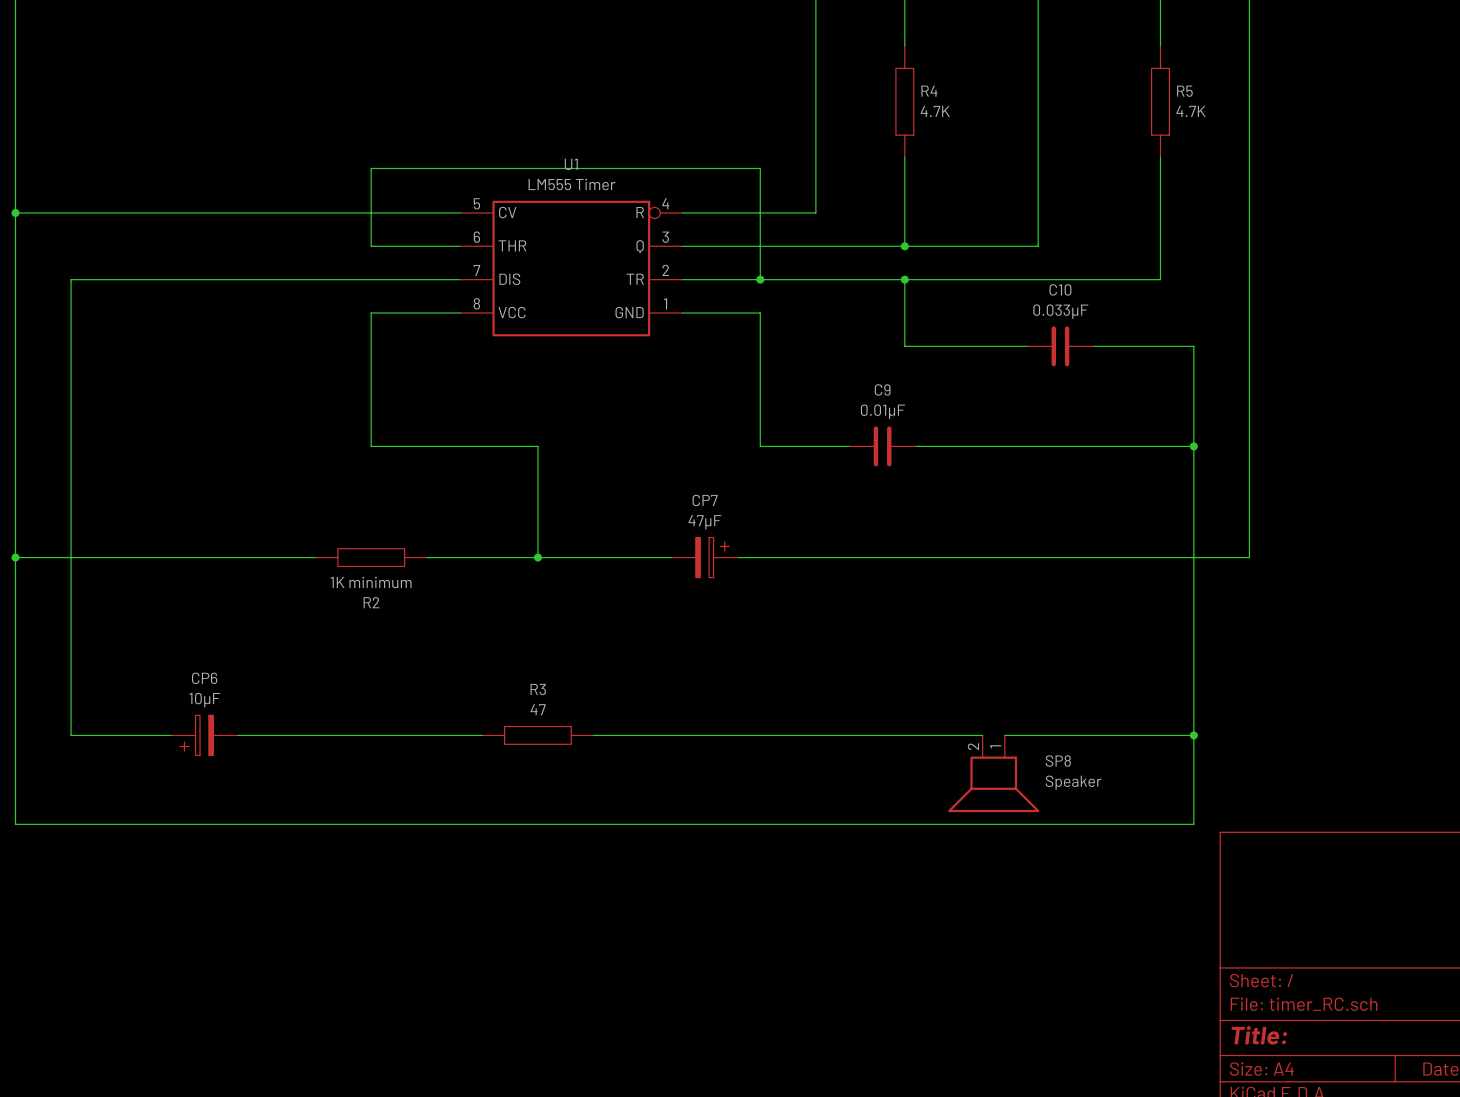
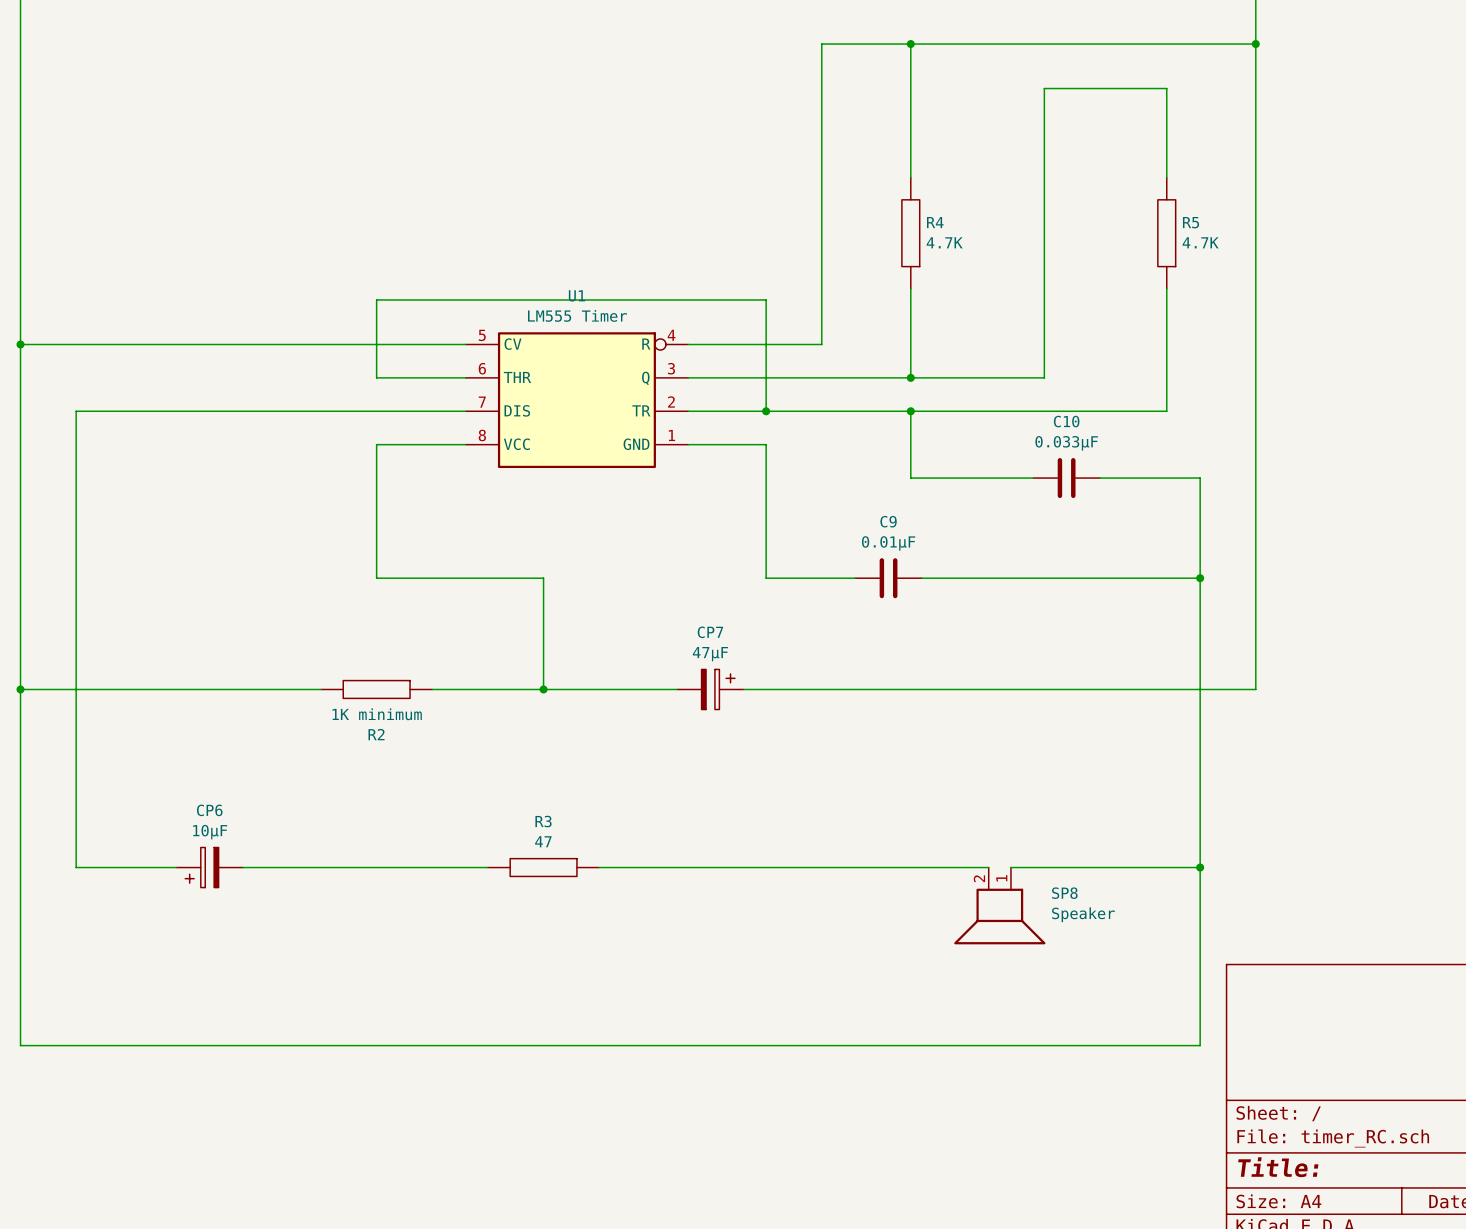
wire: (15, 824) (1193, 824) -> (20, 956) (20, 1045) (1200, 1045) (1200, 956)

